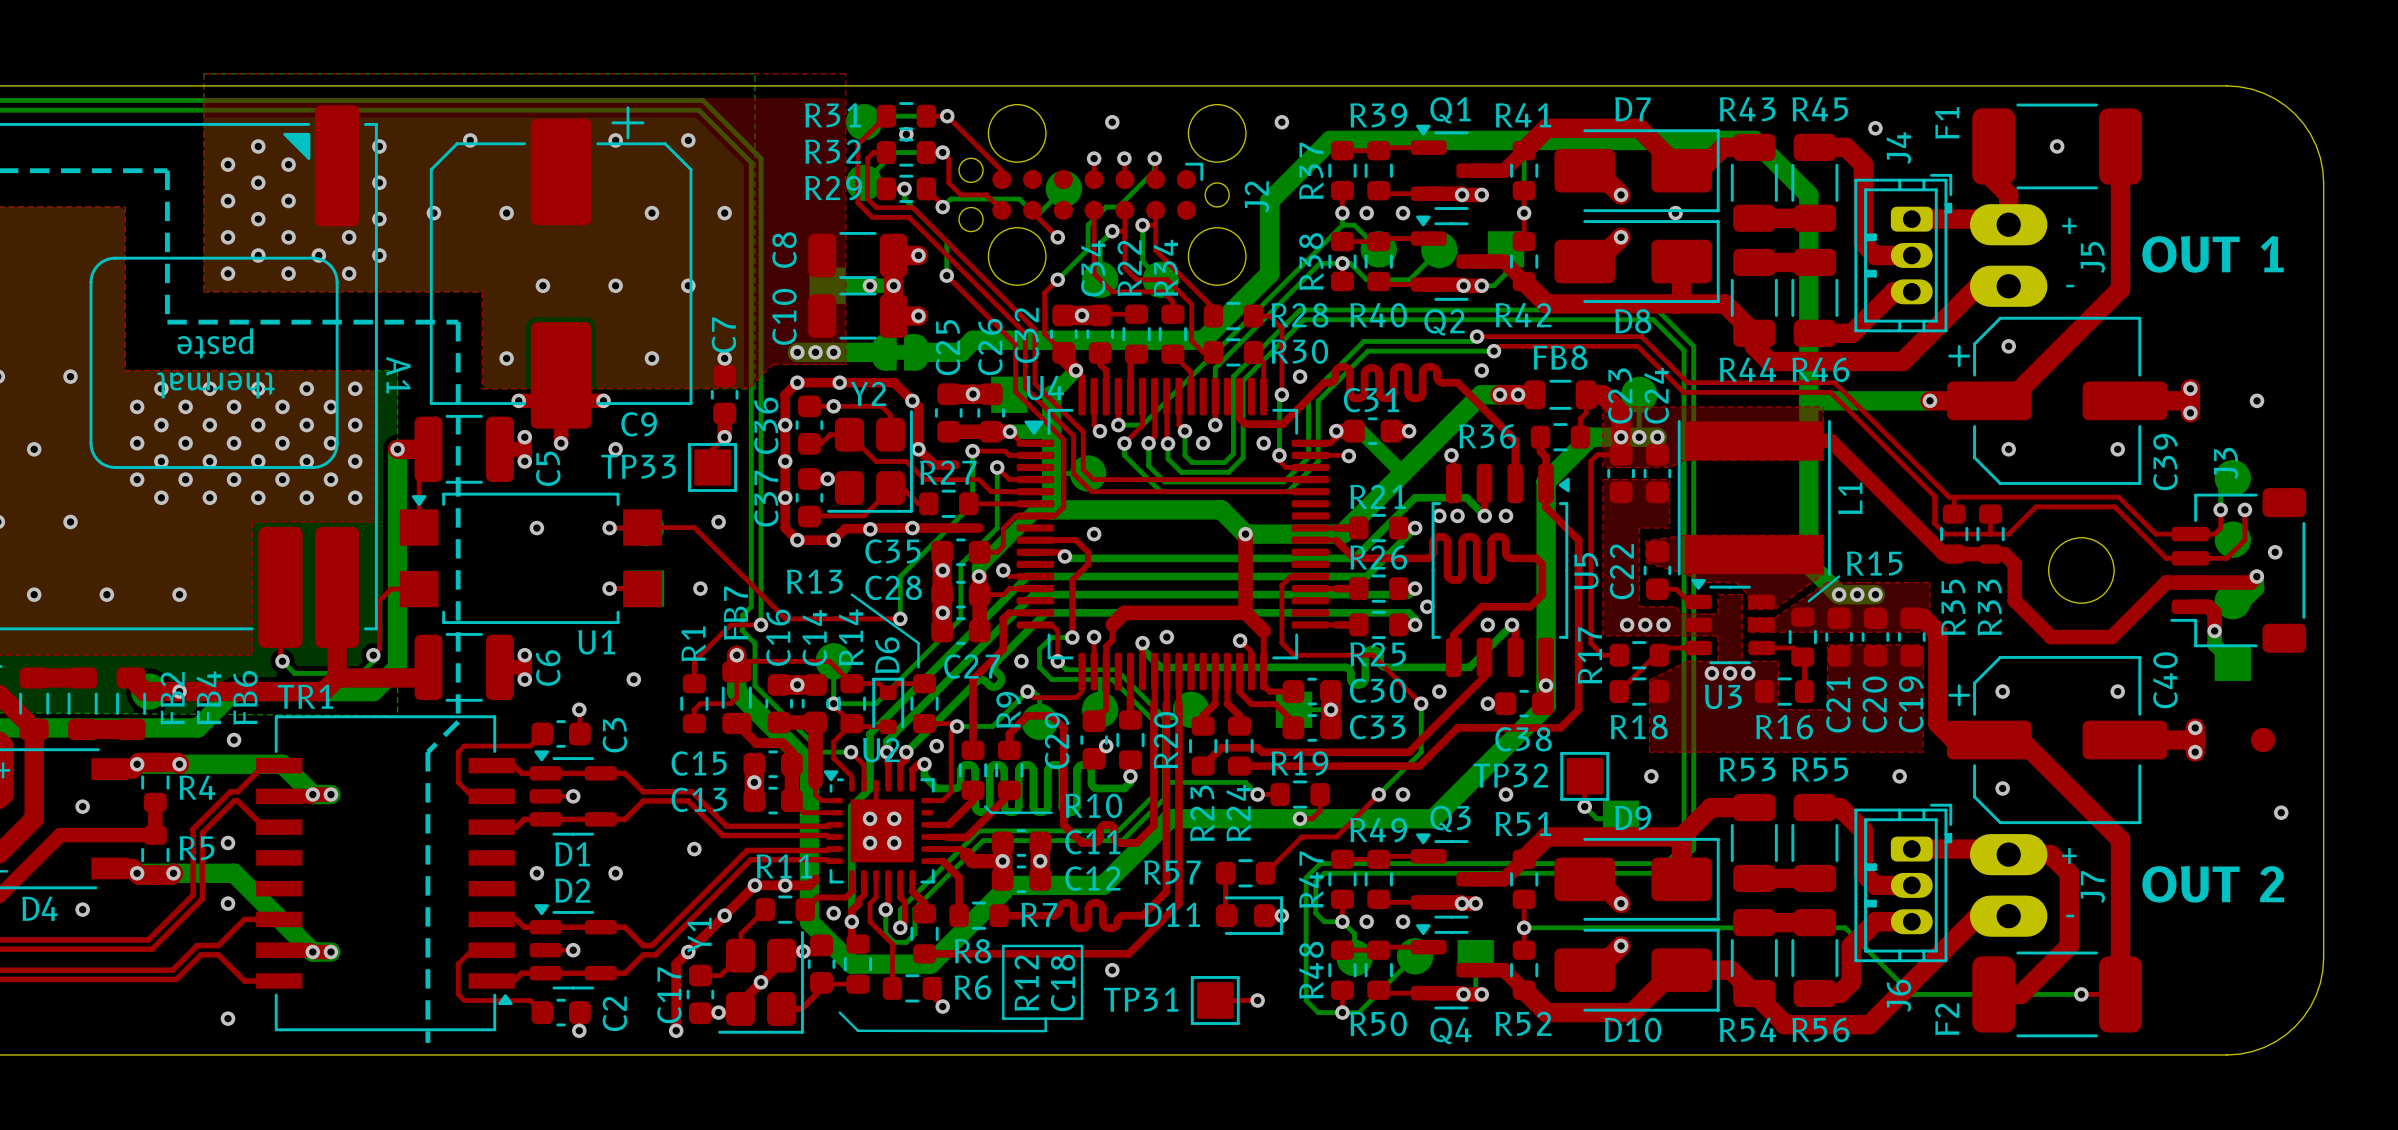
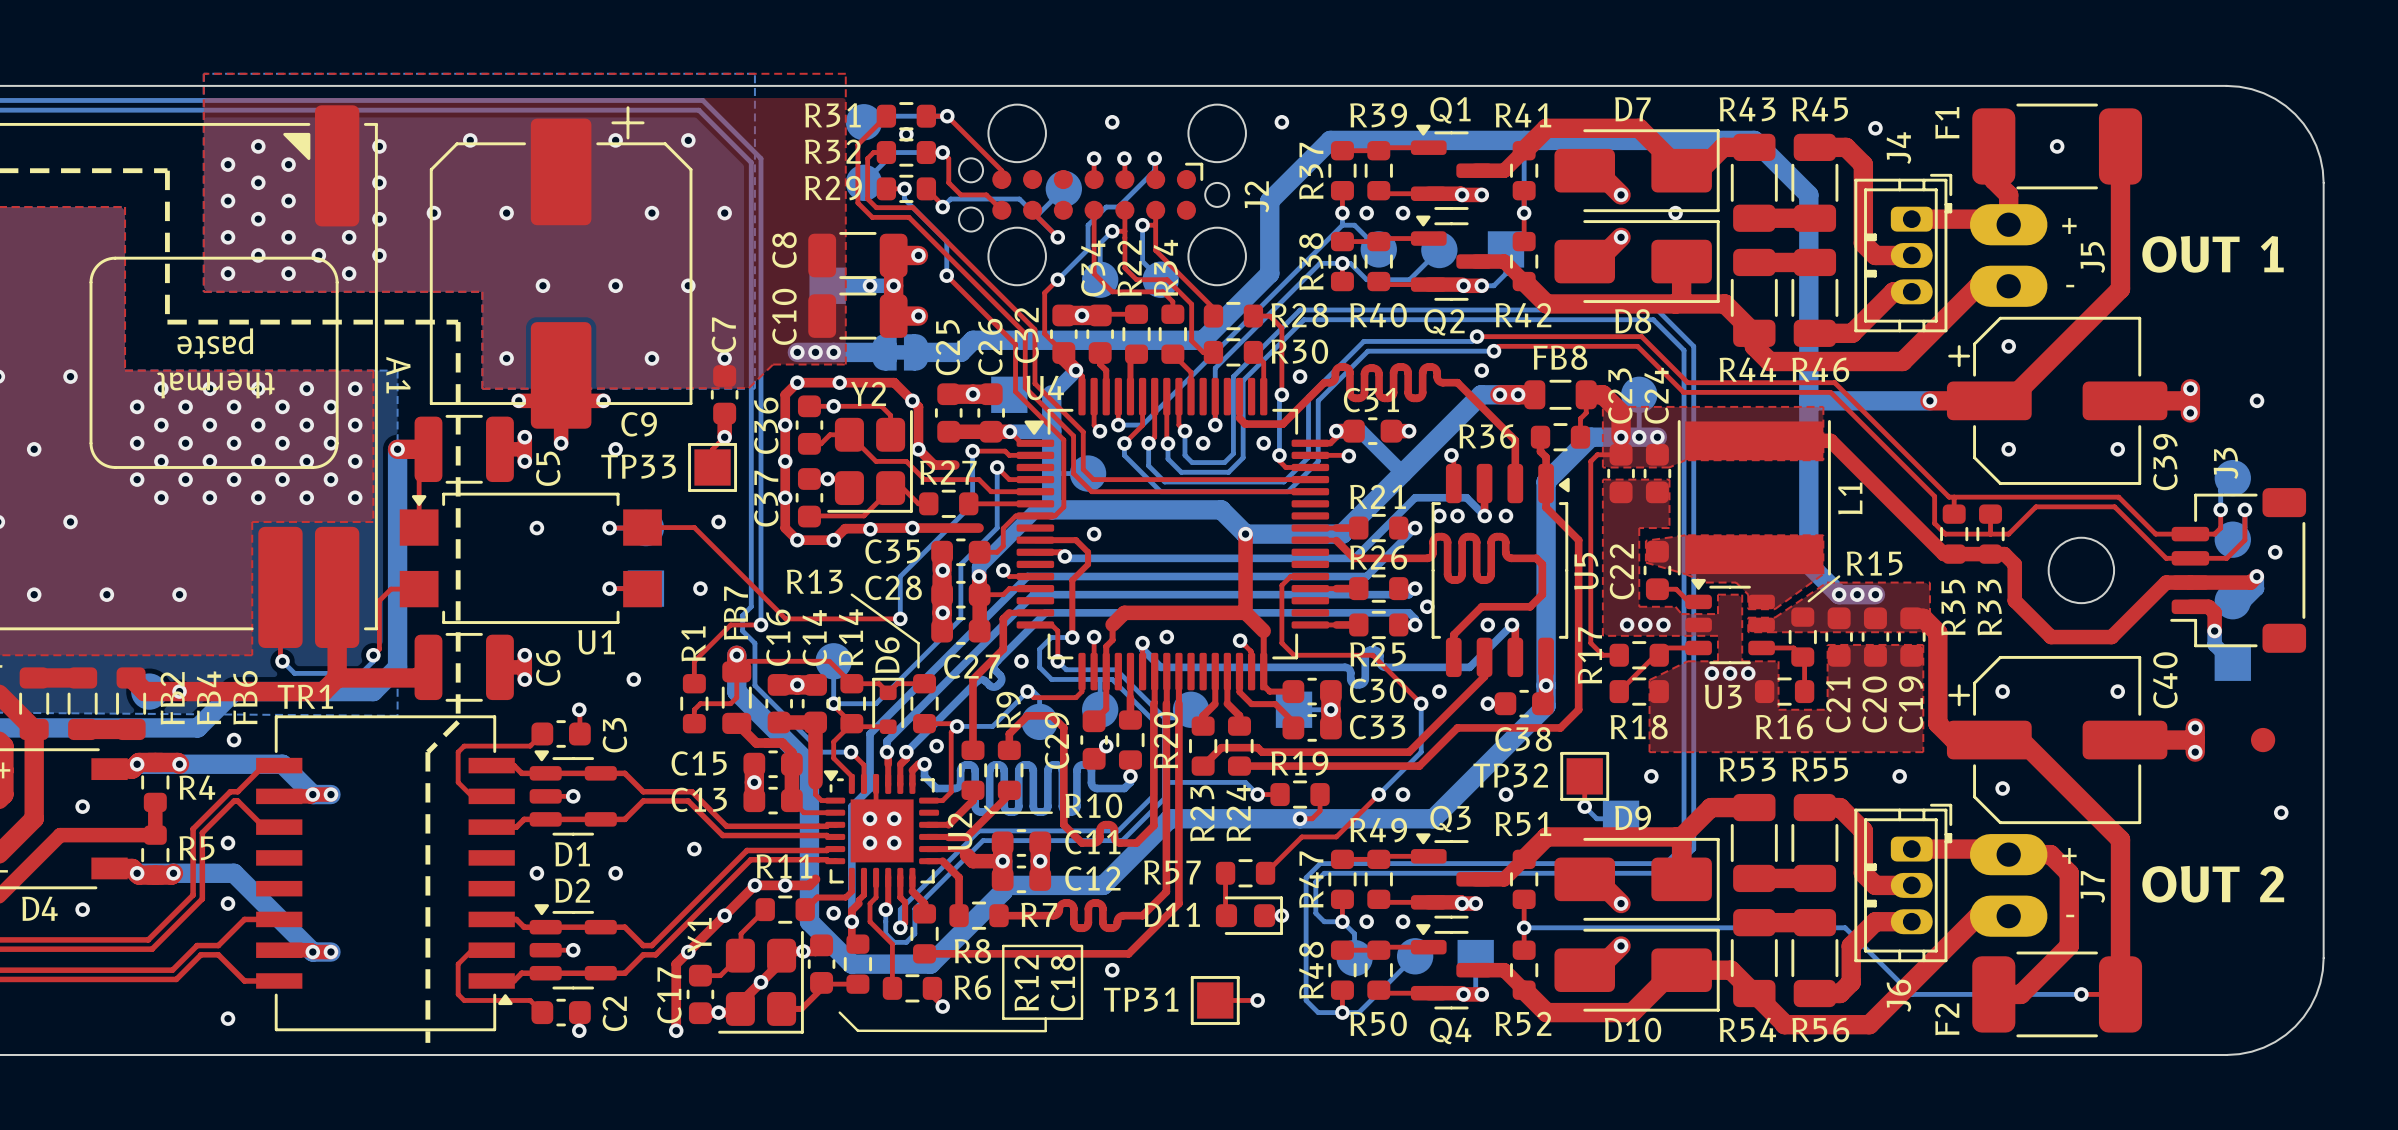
U2 name rotation: 0° (881, 750) -> 90° counterclockwise (960, 831)
U2 name position: U2 (881, 750) -> U2 (960, 831)
U2 footprint: [823, 770, 935, 884] -> [823, 770, 940, 888]

